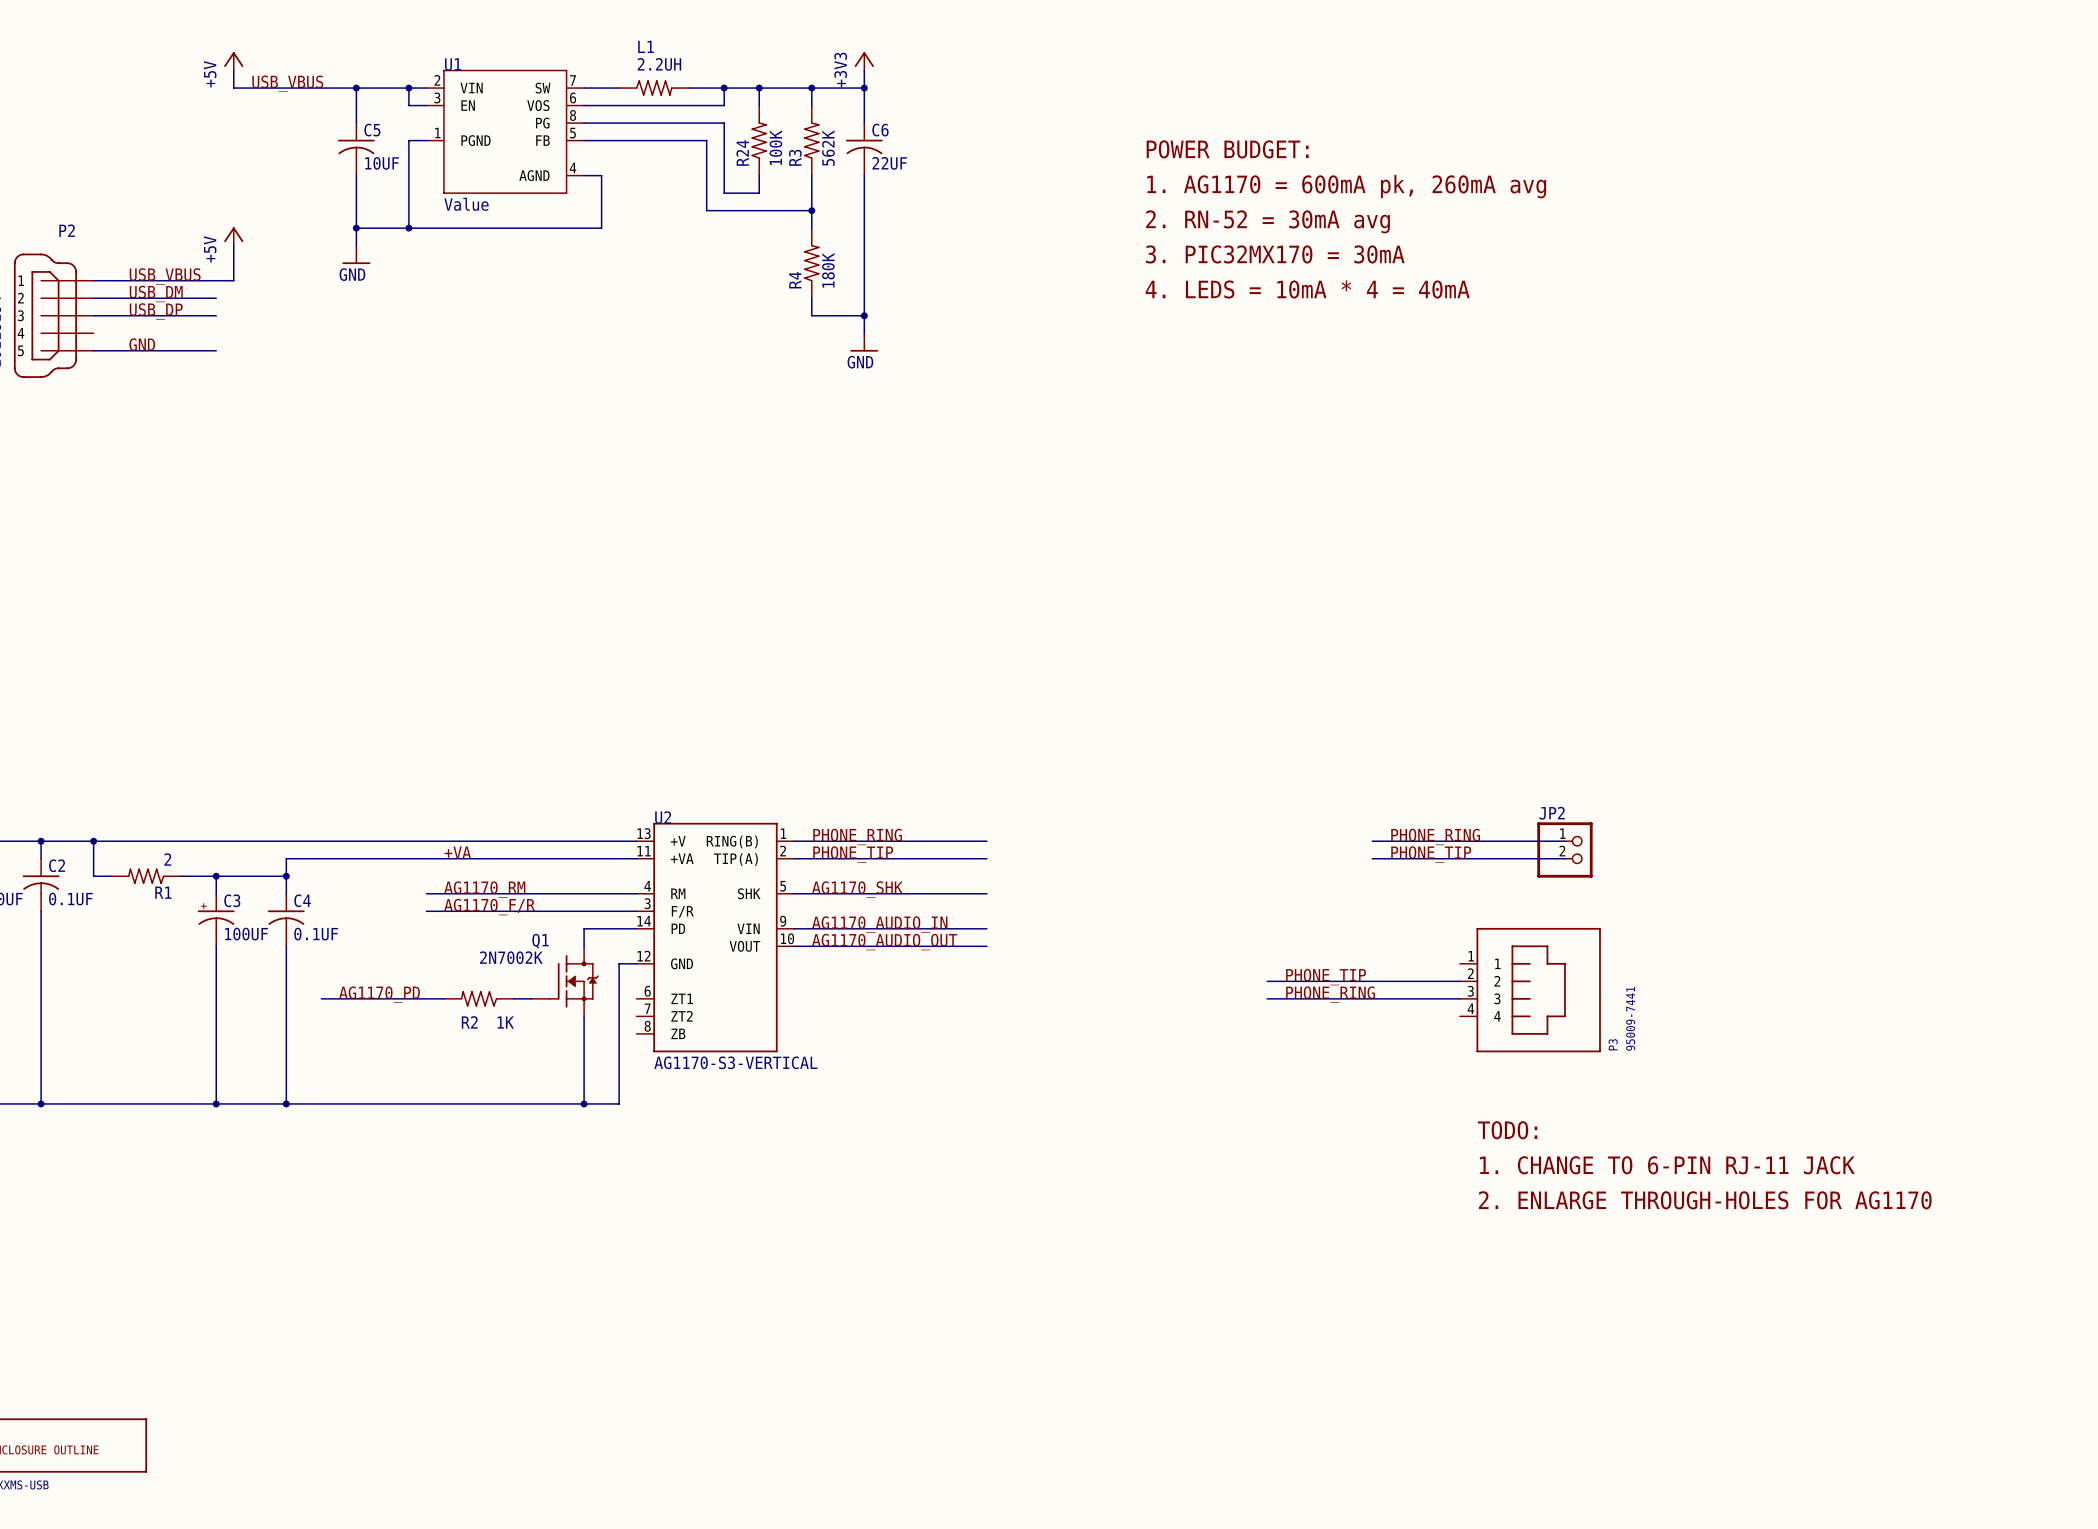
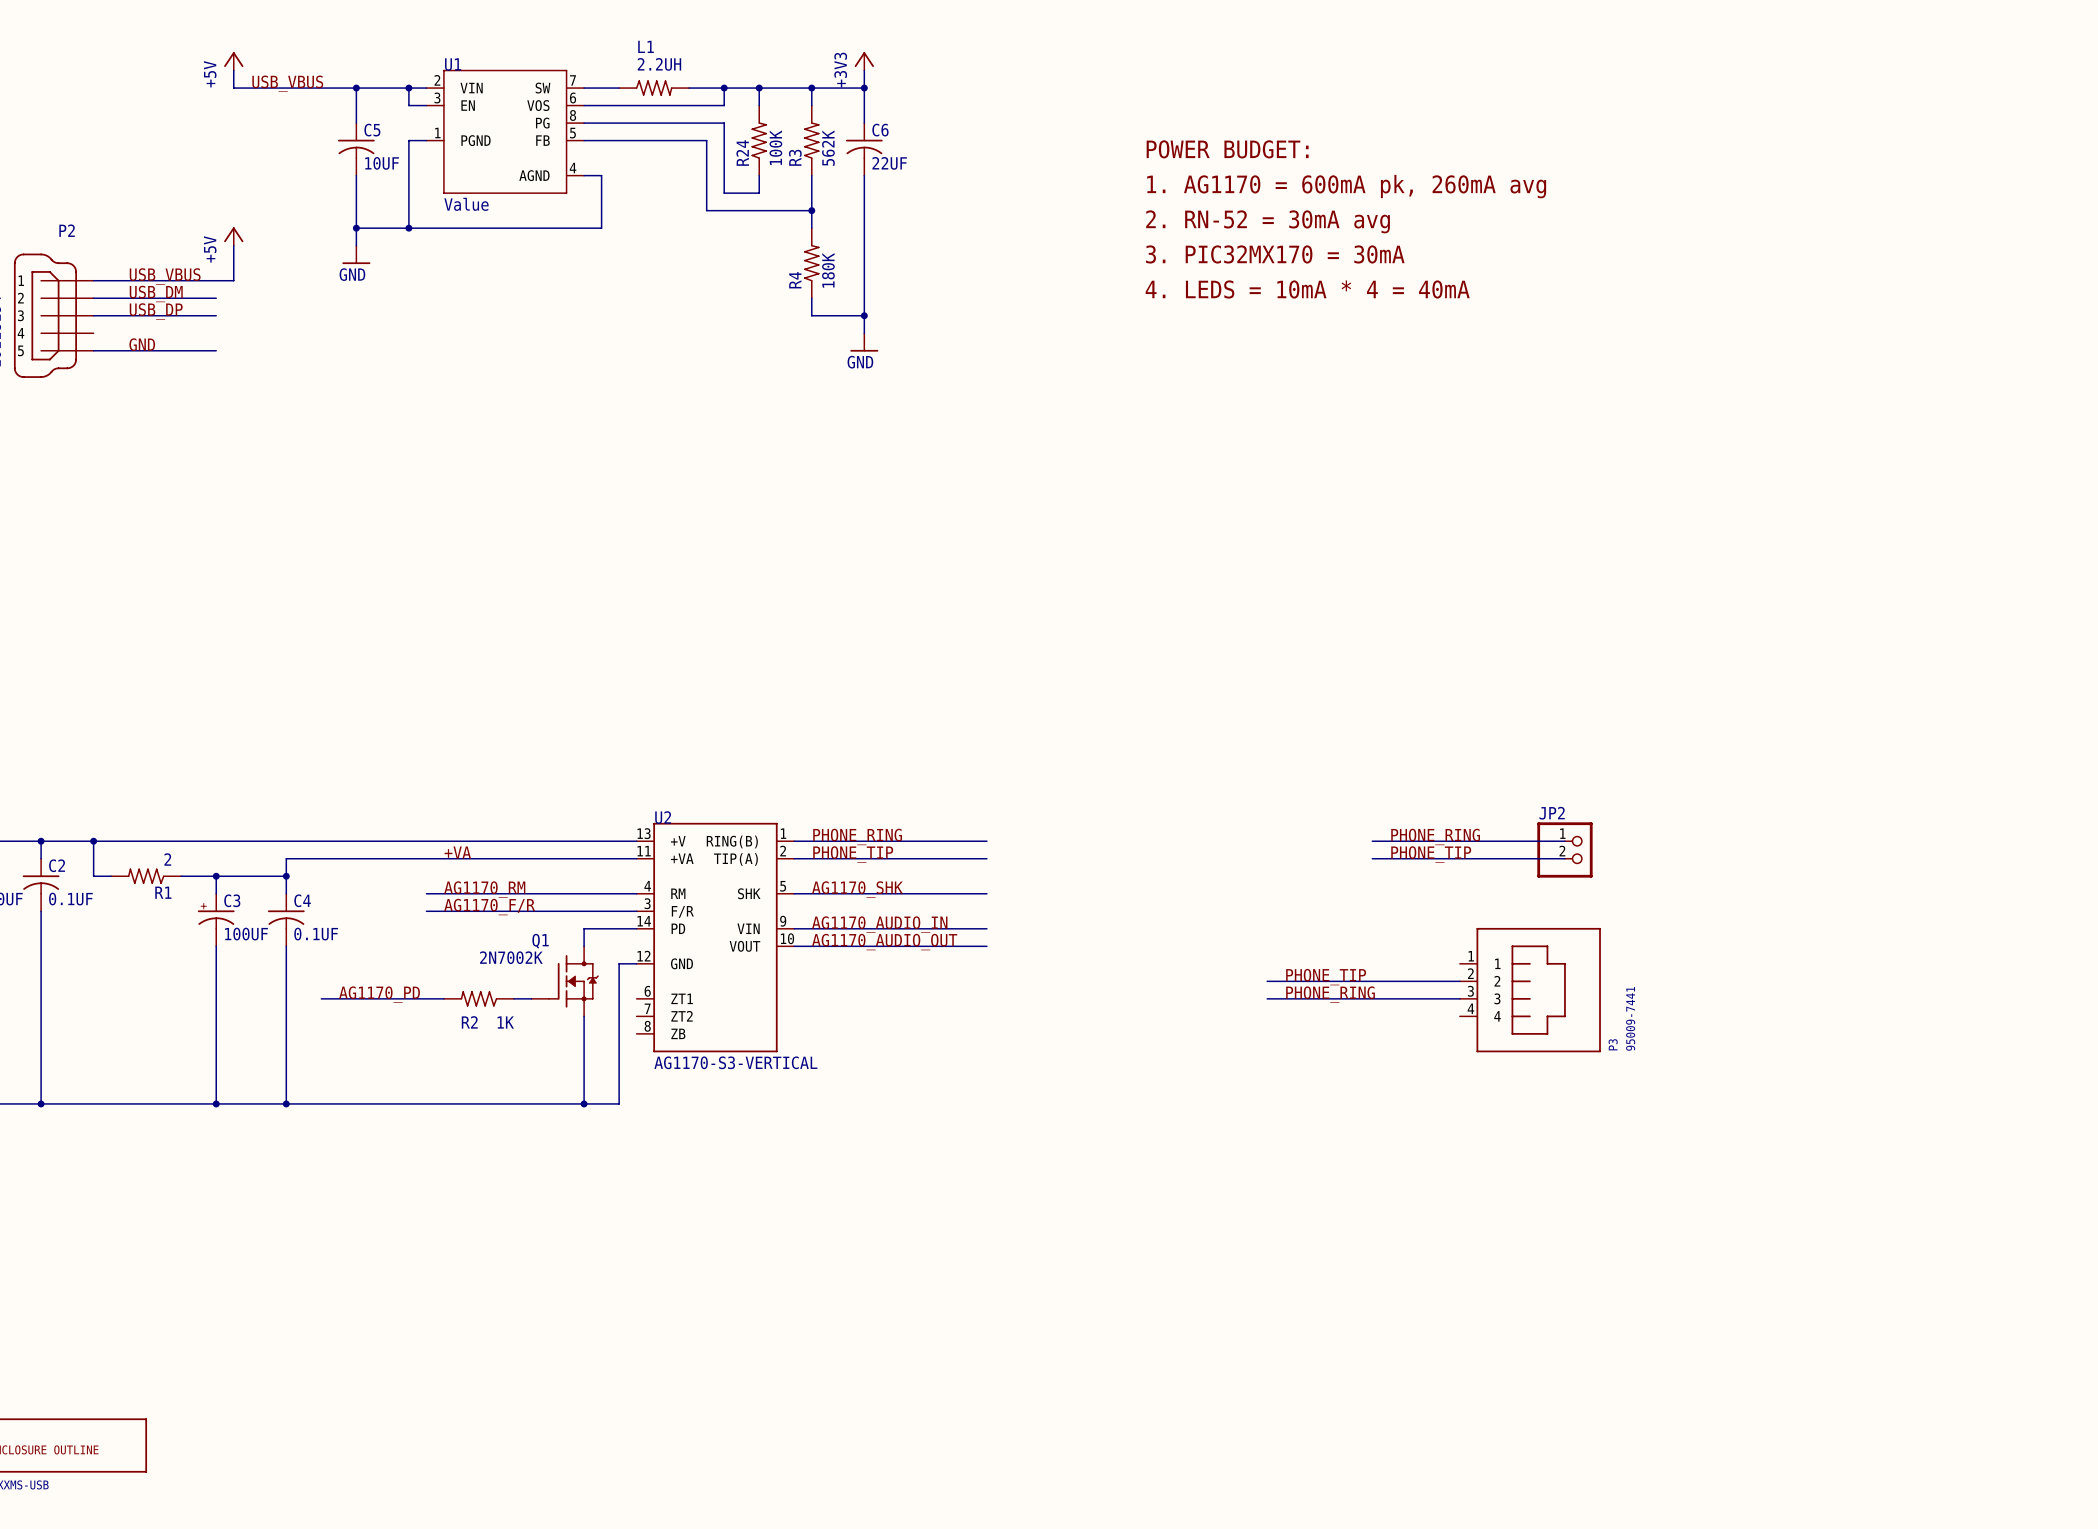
text: TODO: (1507, 1130) -> none
text: 1. CHANGE TO 6-PIN RJ-11 JACK (1667, 1165) -> none
text: 2. ENLARGE THROUGH-HOLES FOR AG1170 (1705, 1200) -> none

